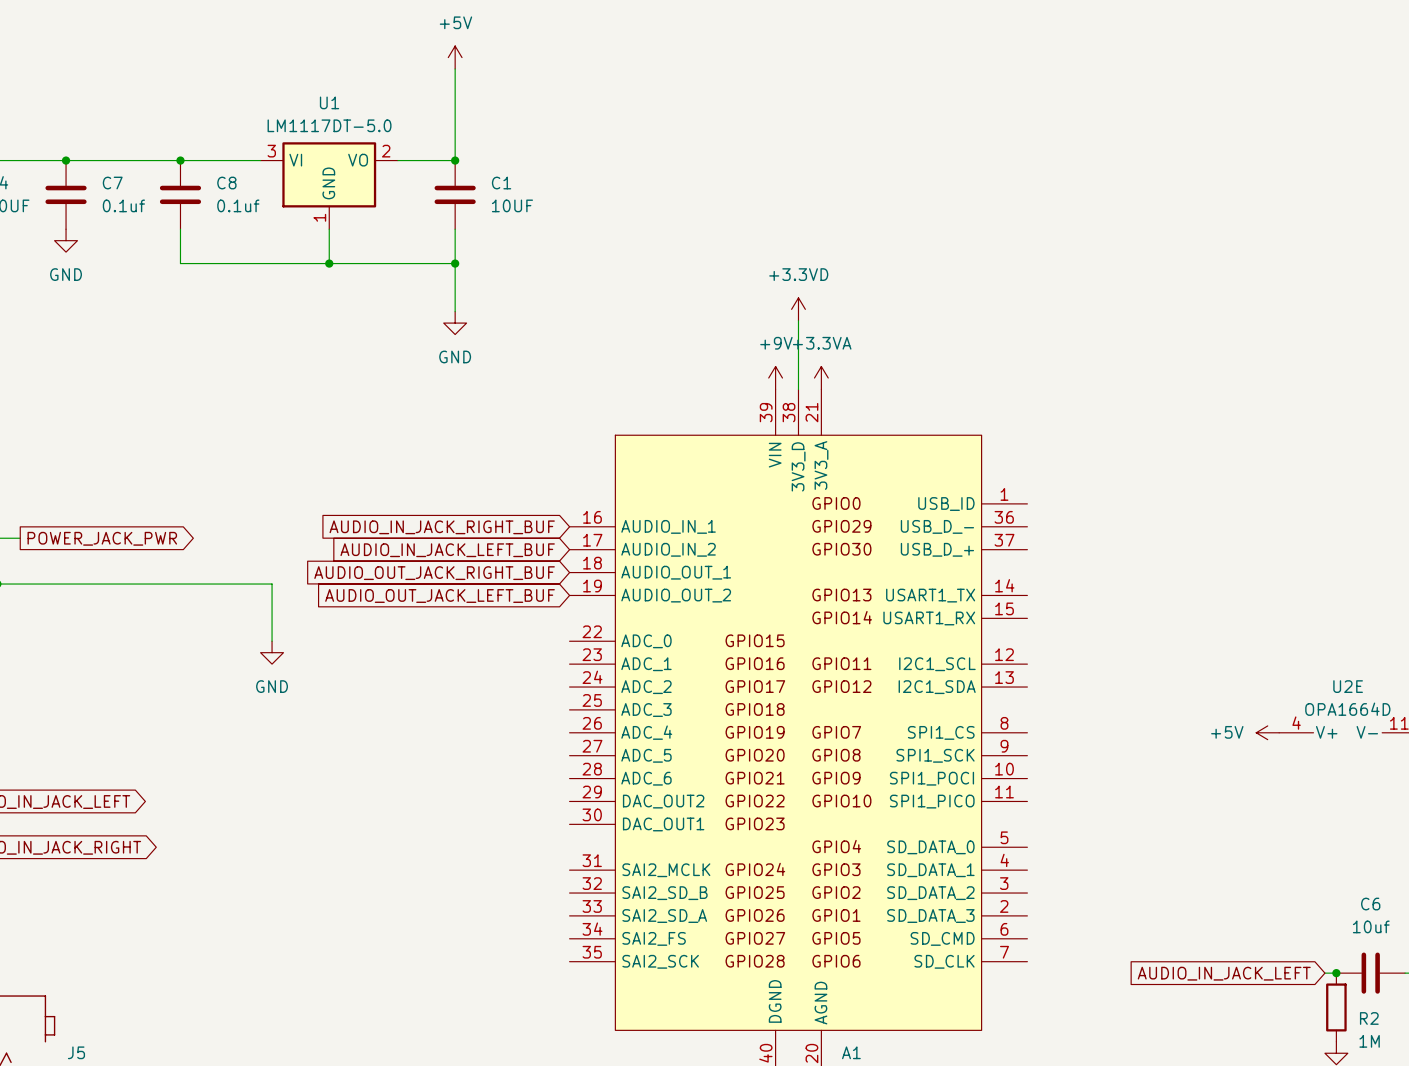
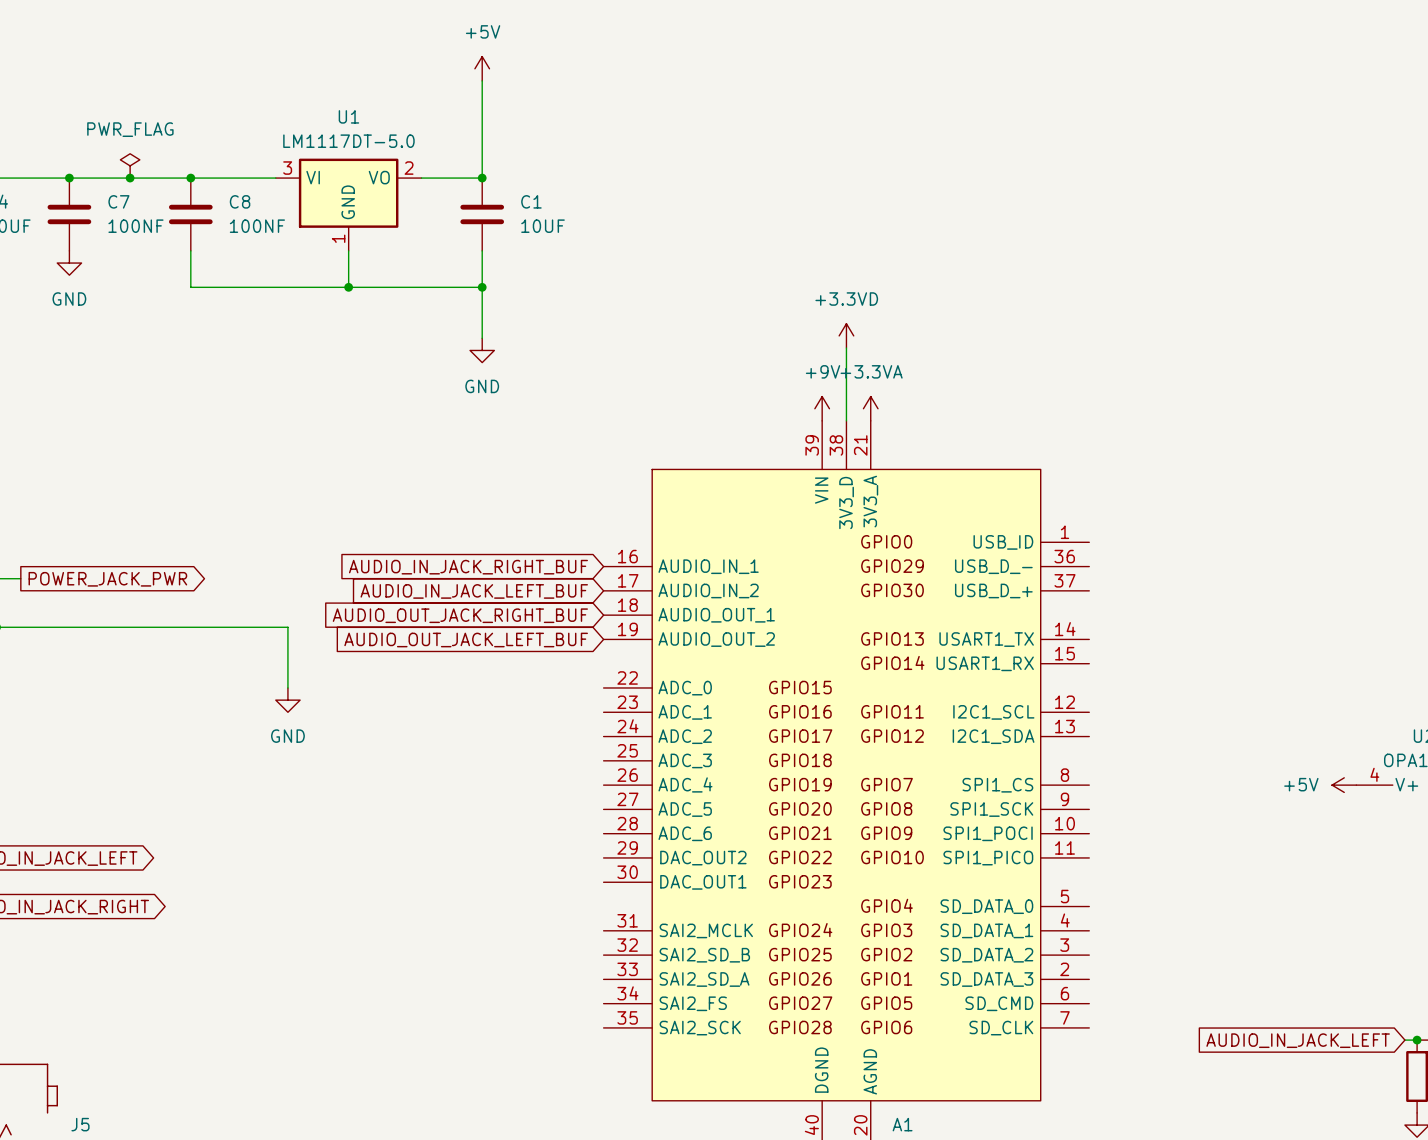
power symbol: none -> PWR_FLAG (130, 165)
junction: none -> (130, 178)
C7 value: 0.1uf (123, 205) -> 100NF (135, 226)
C8 value: 0.1uf (238, 205) -> 100NF (257, 226)

